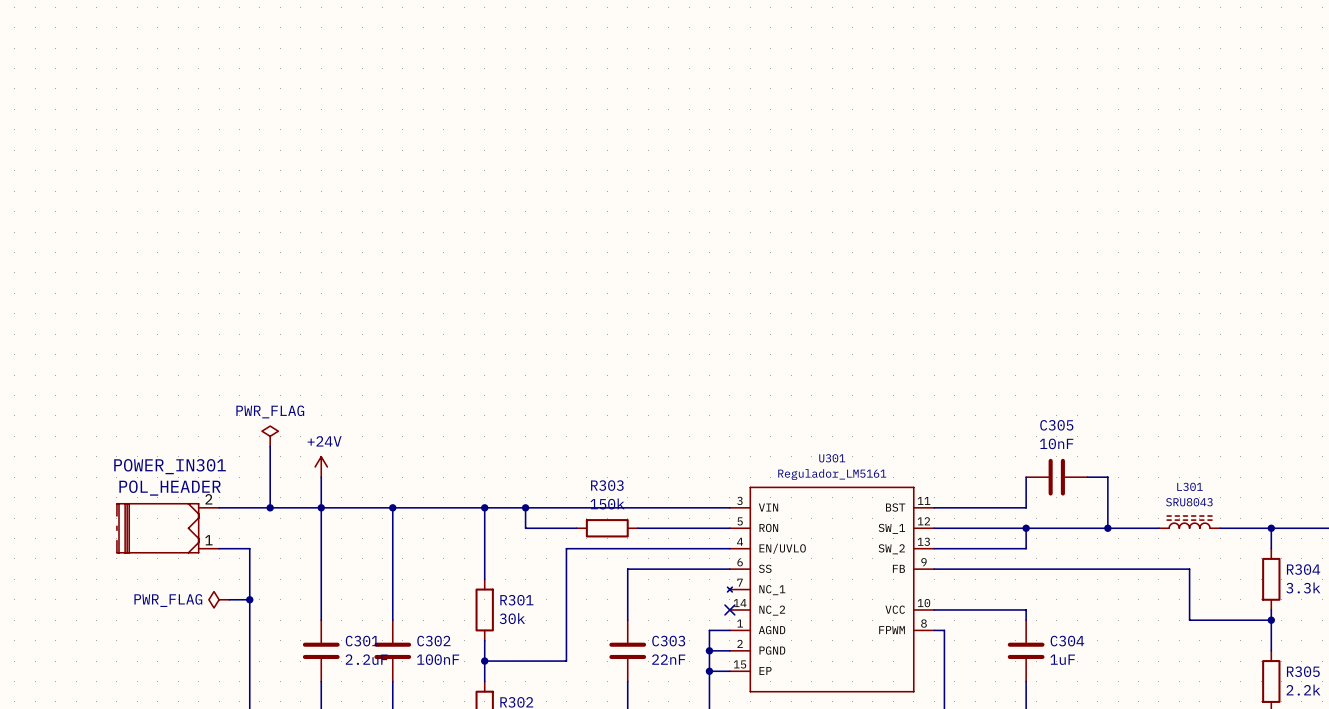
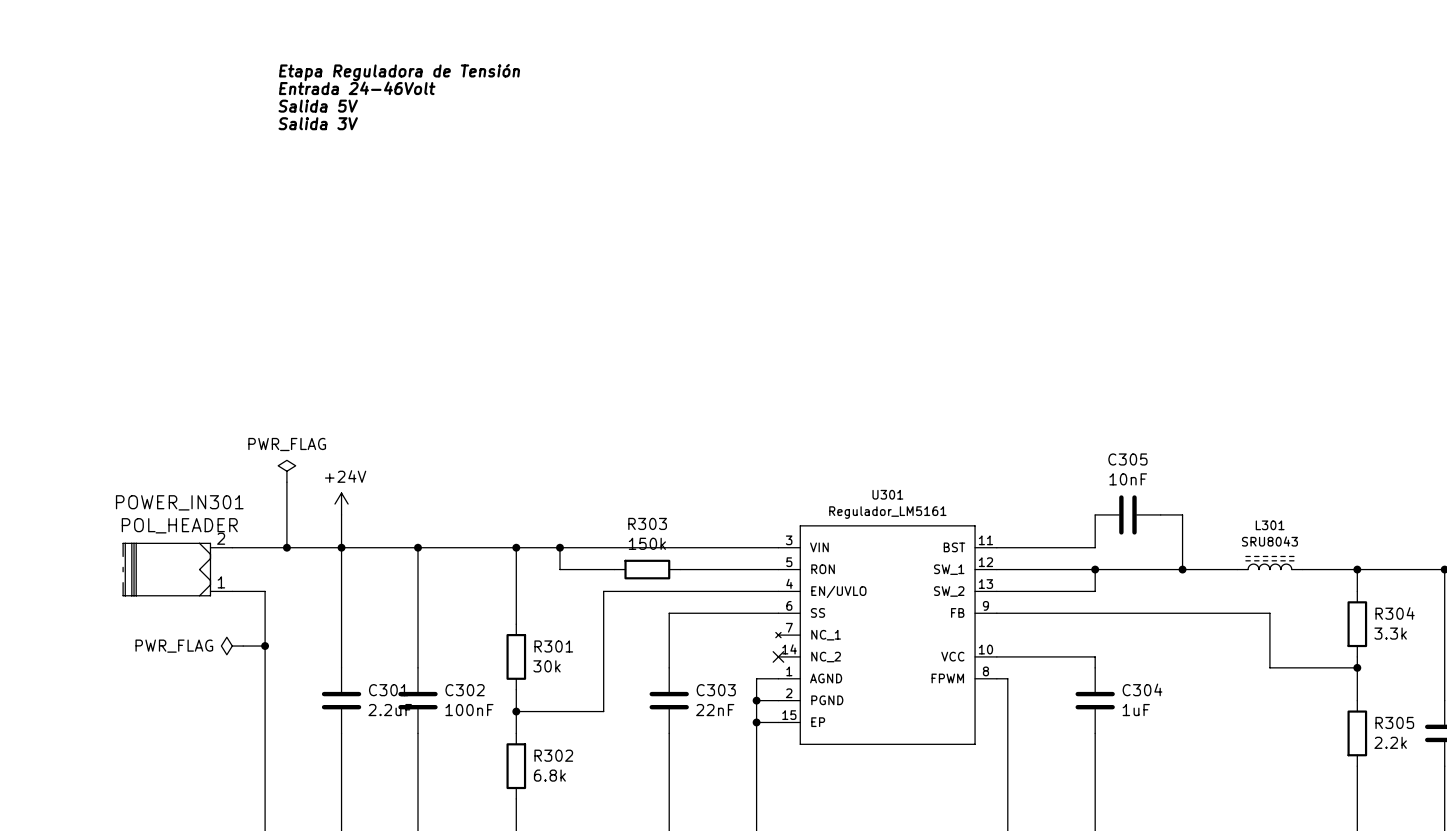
text: none -> Etapa Reguladora de Tensión (399, 72)
text: none -> Entrada 24-46Volt (357, 88)
text: none -> Salida 5V (318, 106)
text: none -> Salida 3V (318, 123)

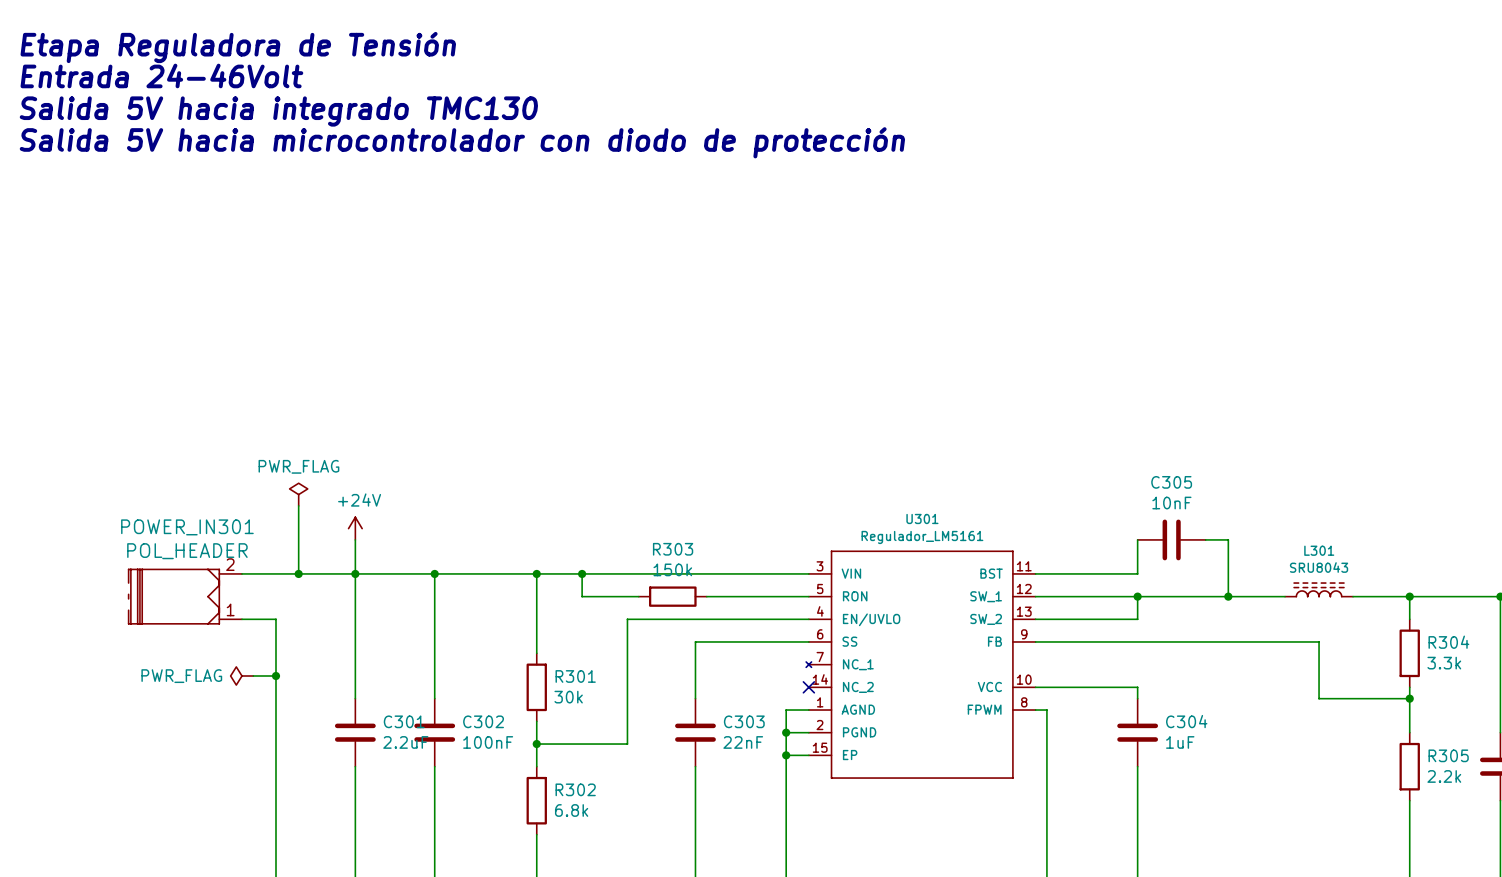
text: none -> Etapa Reguladora de Tensión (238, 47)
text: none -> Entrada 24-46Volt (161, 75)
text: Etapa Reguladora de Tensión (399, 72) -> none
text: Entrada 24-46Volt (357, 88) -> none
text: none -> Salida 5V hacia integrado TMC130 (278, 111)
text: Salida 5V (318, 106) -> none
text: Salida 3V (318, 123) -> none
text: none -> Salida 5V hacia microcontrolador con diodo de protección (462, 142)

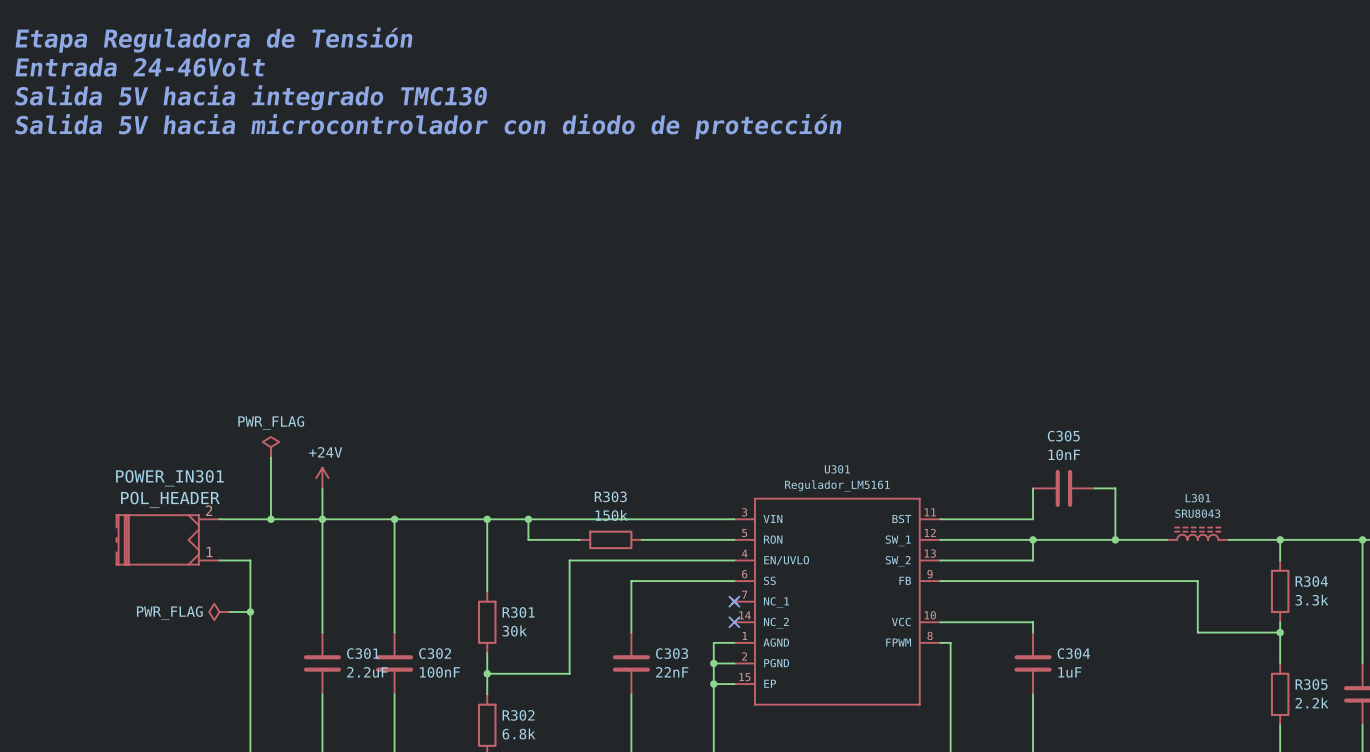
no-connect mark: none -> (734, 601)

